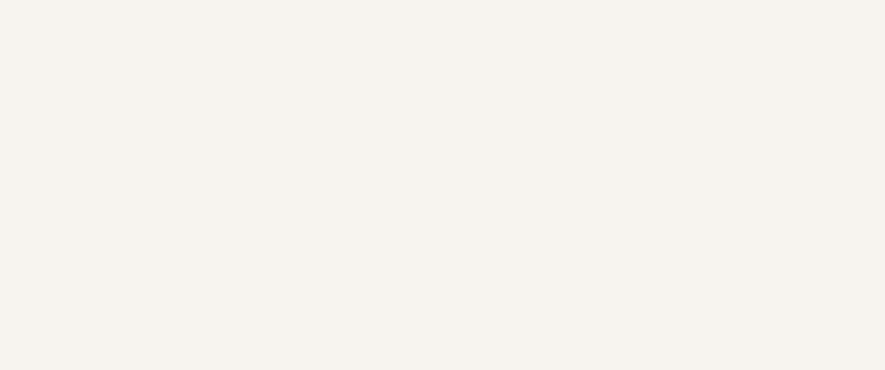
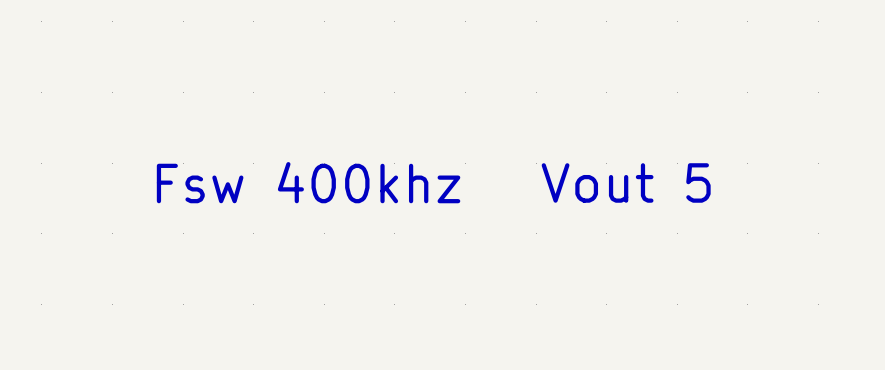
text: none -> Fsw 400khz (308, 182)
text: none -> Vout 5 (626, 182)

